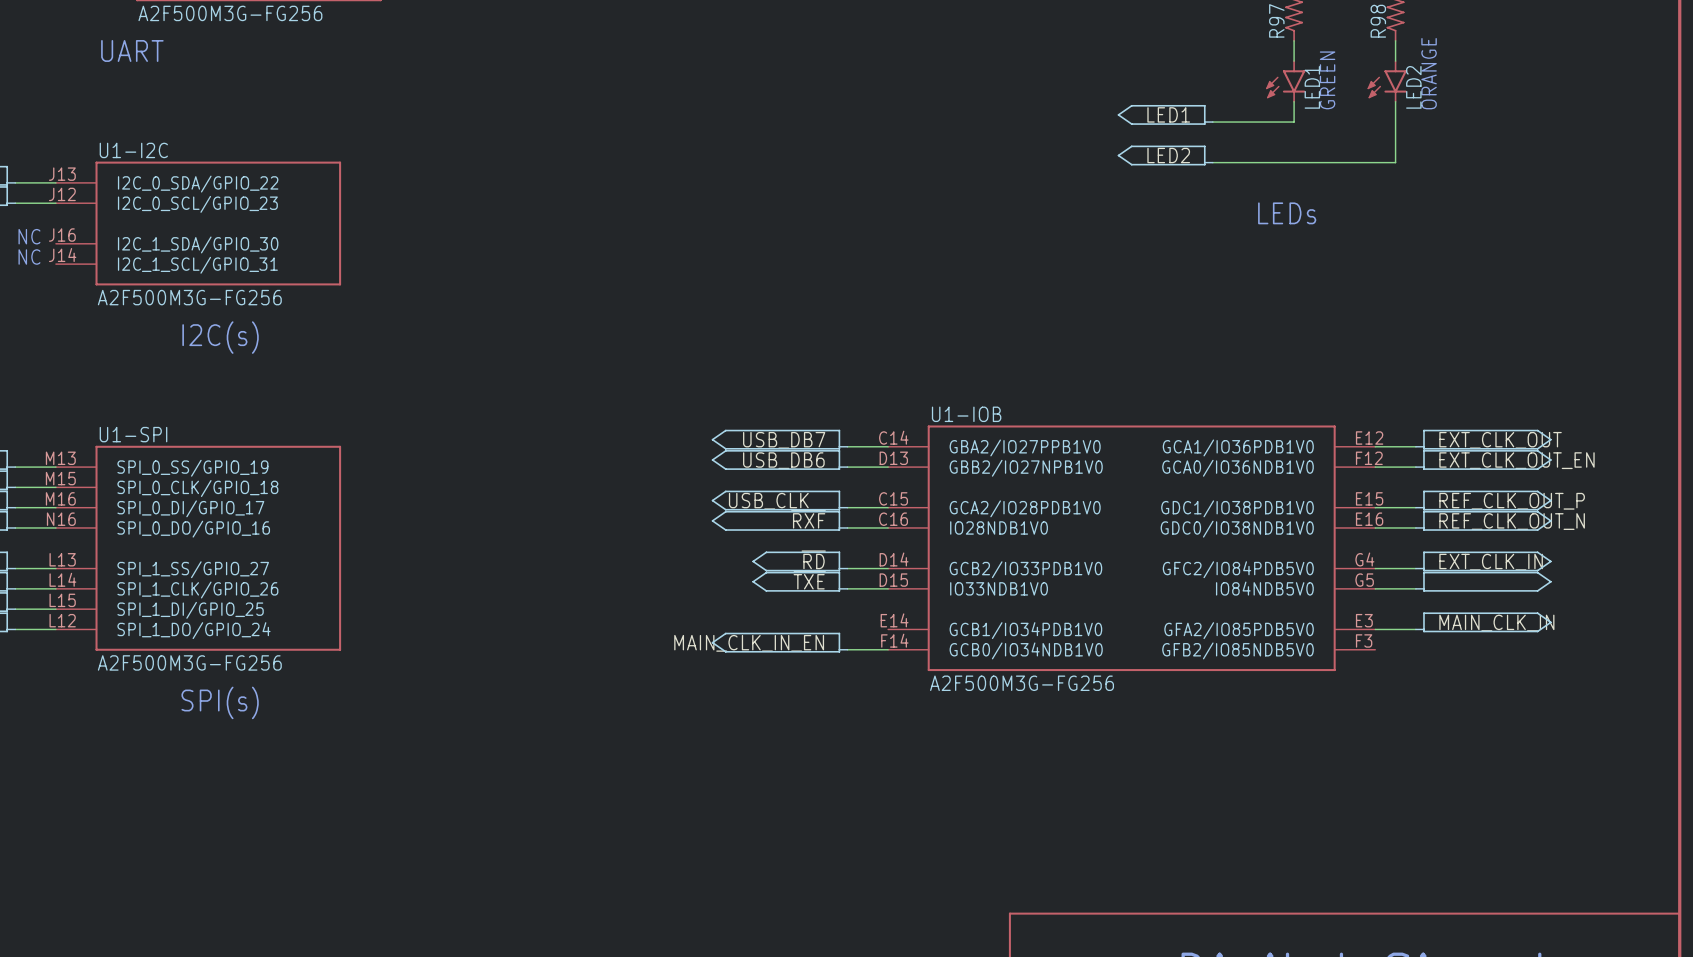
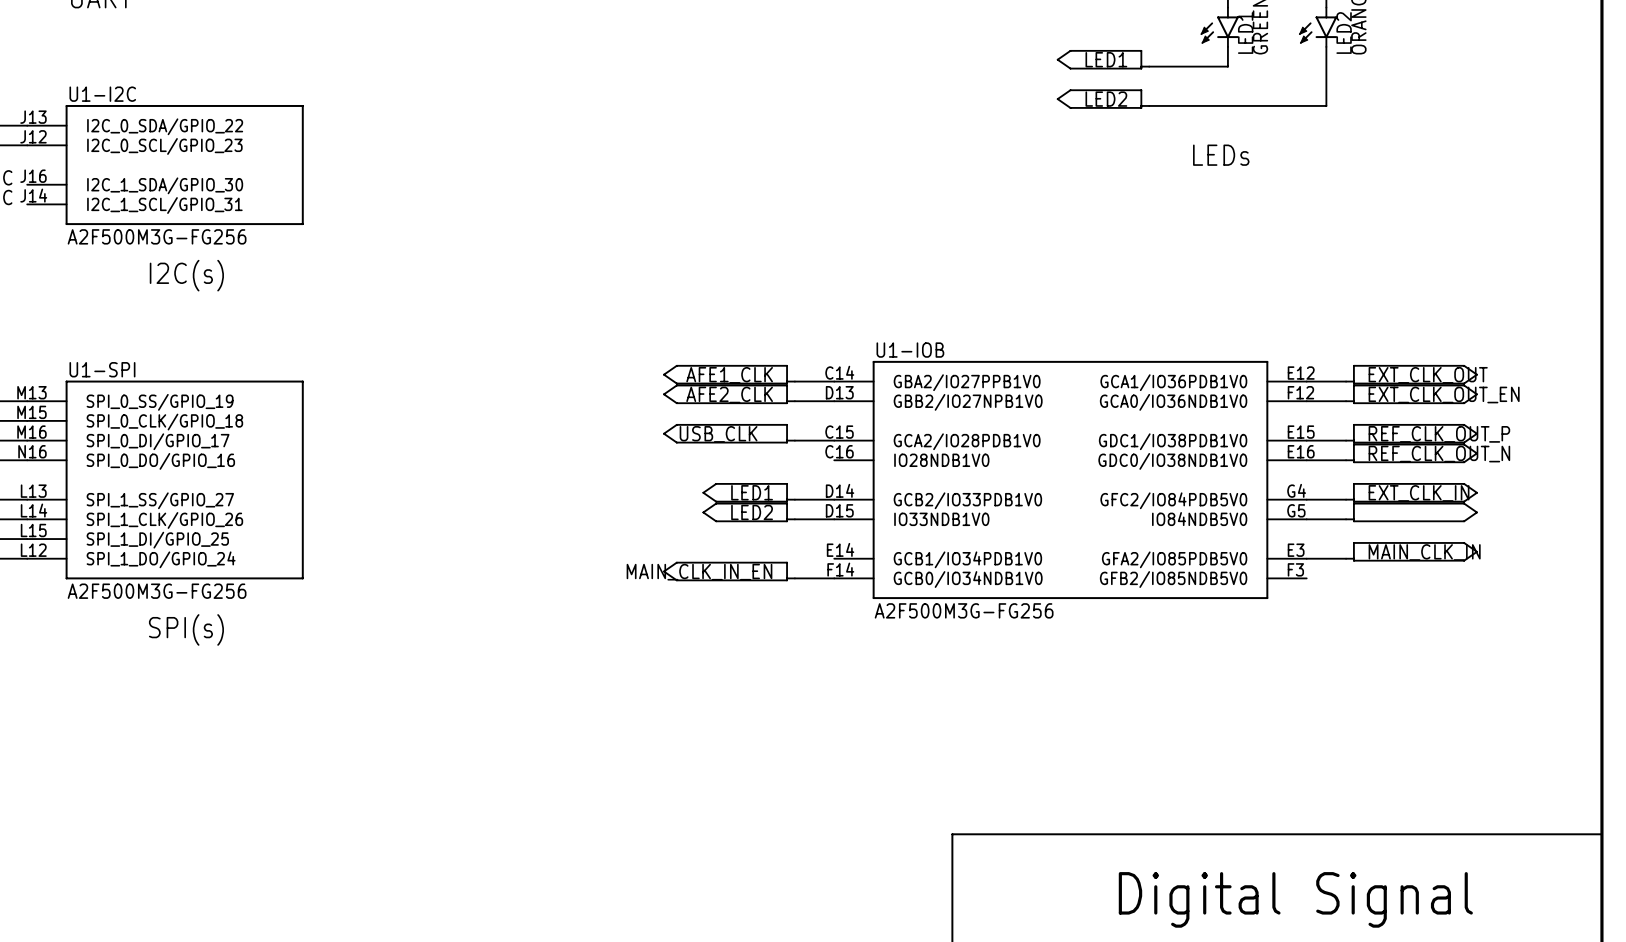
label: USB_DB7 (784, 440) -> AFE1_CLK (729, 375)
label: USB_DB6 (783, 460) -> AFE2_CLK (729, 395)
label: ~{RXF} (808, 519) -> none
part: (779, 520) -> none
wire: (847, 527) (888, 527) -> none
label: ~{RD} (813, 559) -> LED1 (752, 492)
label: ~{TXE} (809, 580) -> LED2 (752, 512)

